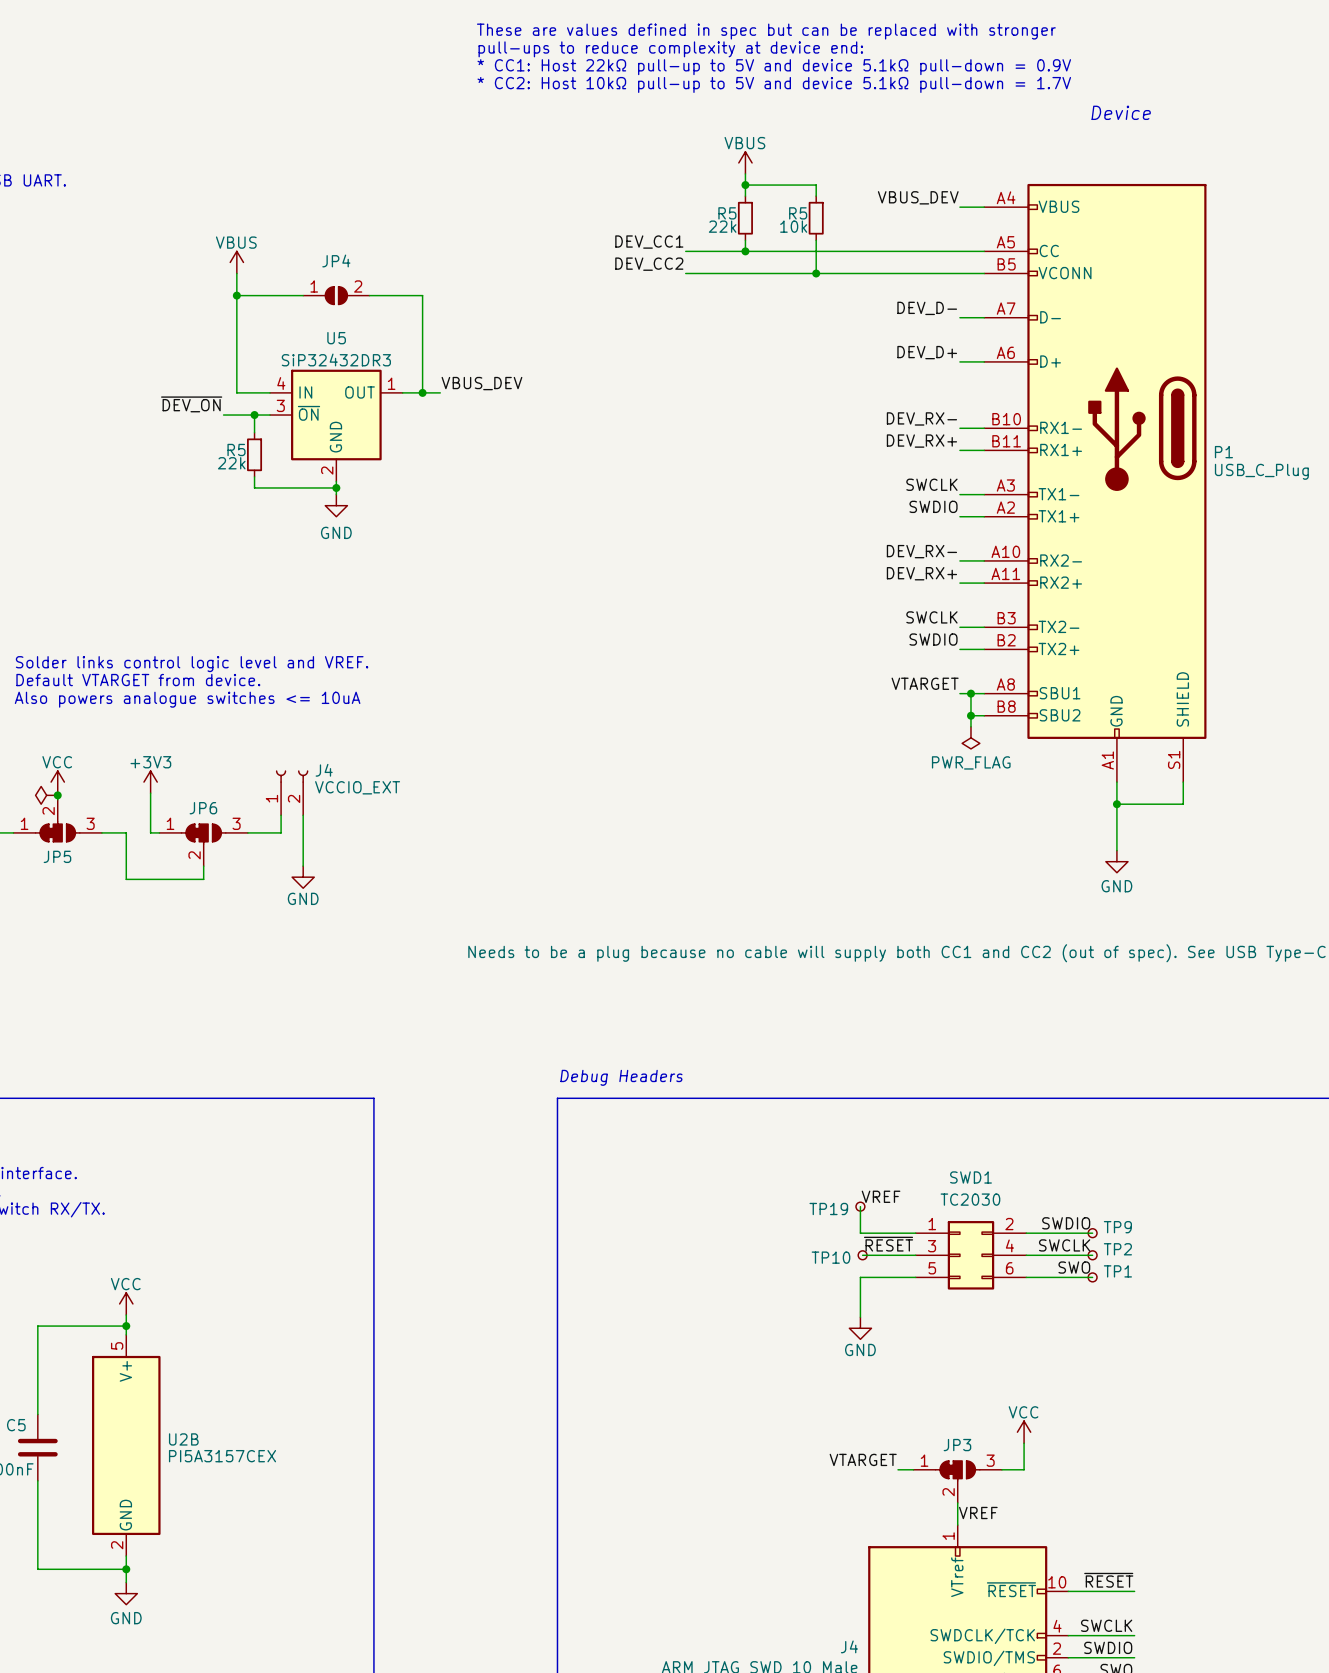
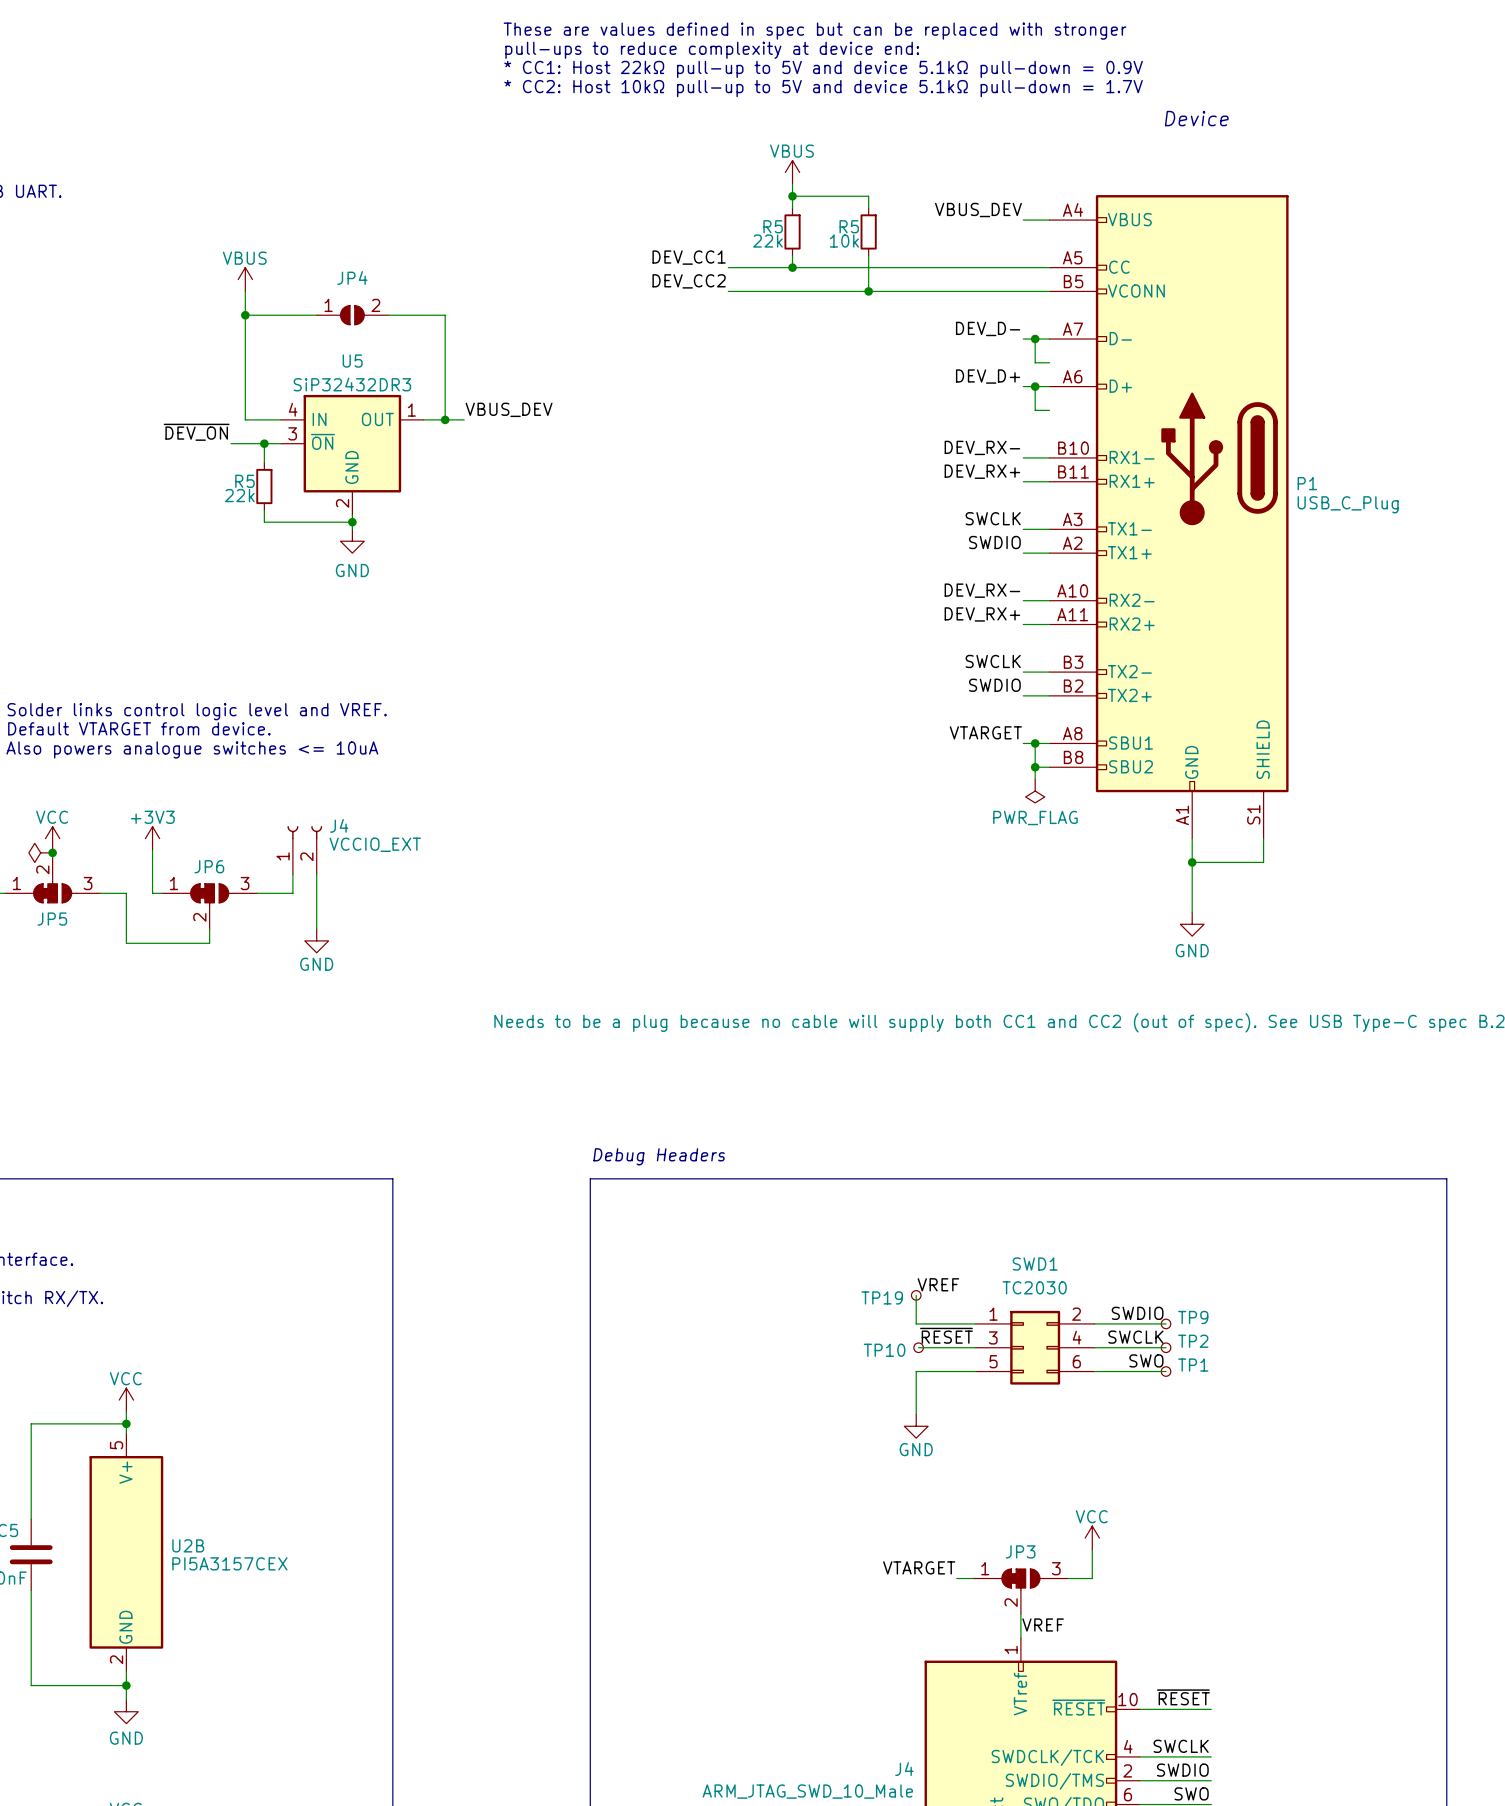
wire: none -> (1035, 339) (1035, 362) (1049, 362)
junction: none -> (1035, 339)
wire: none -> (1035, 386) (1035, 410) (1049, 410)
junction: none -> (1035, 386)

